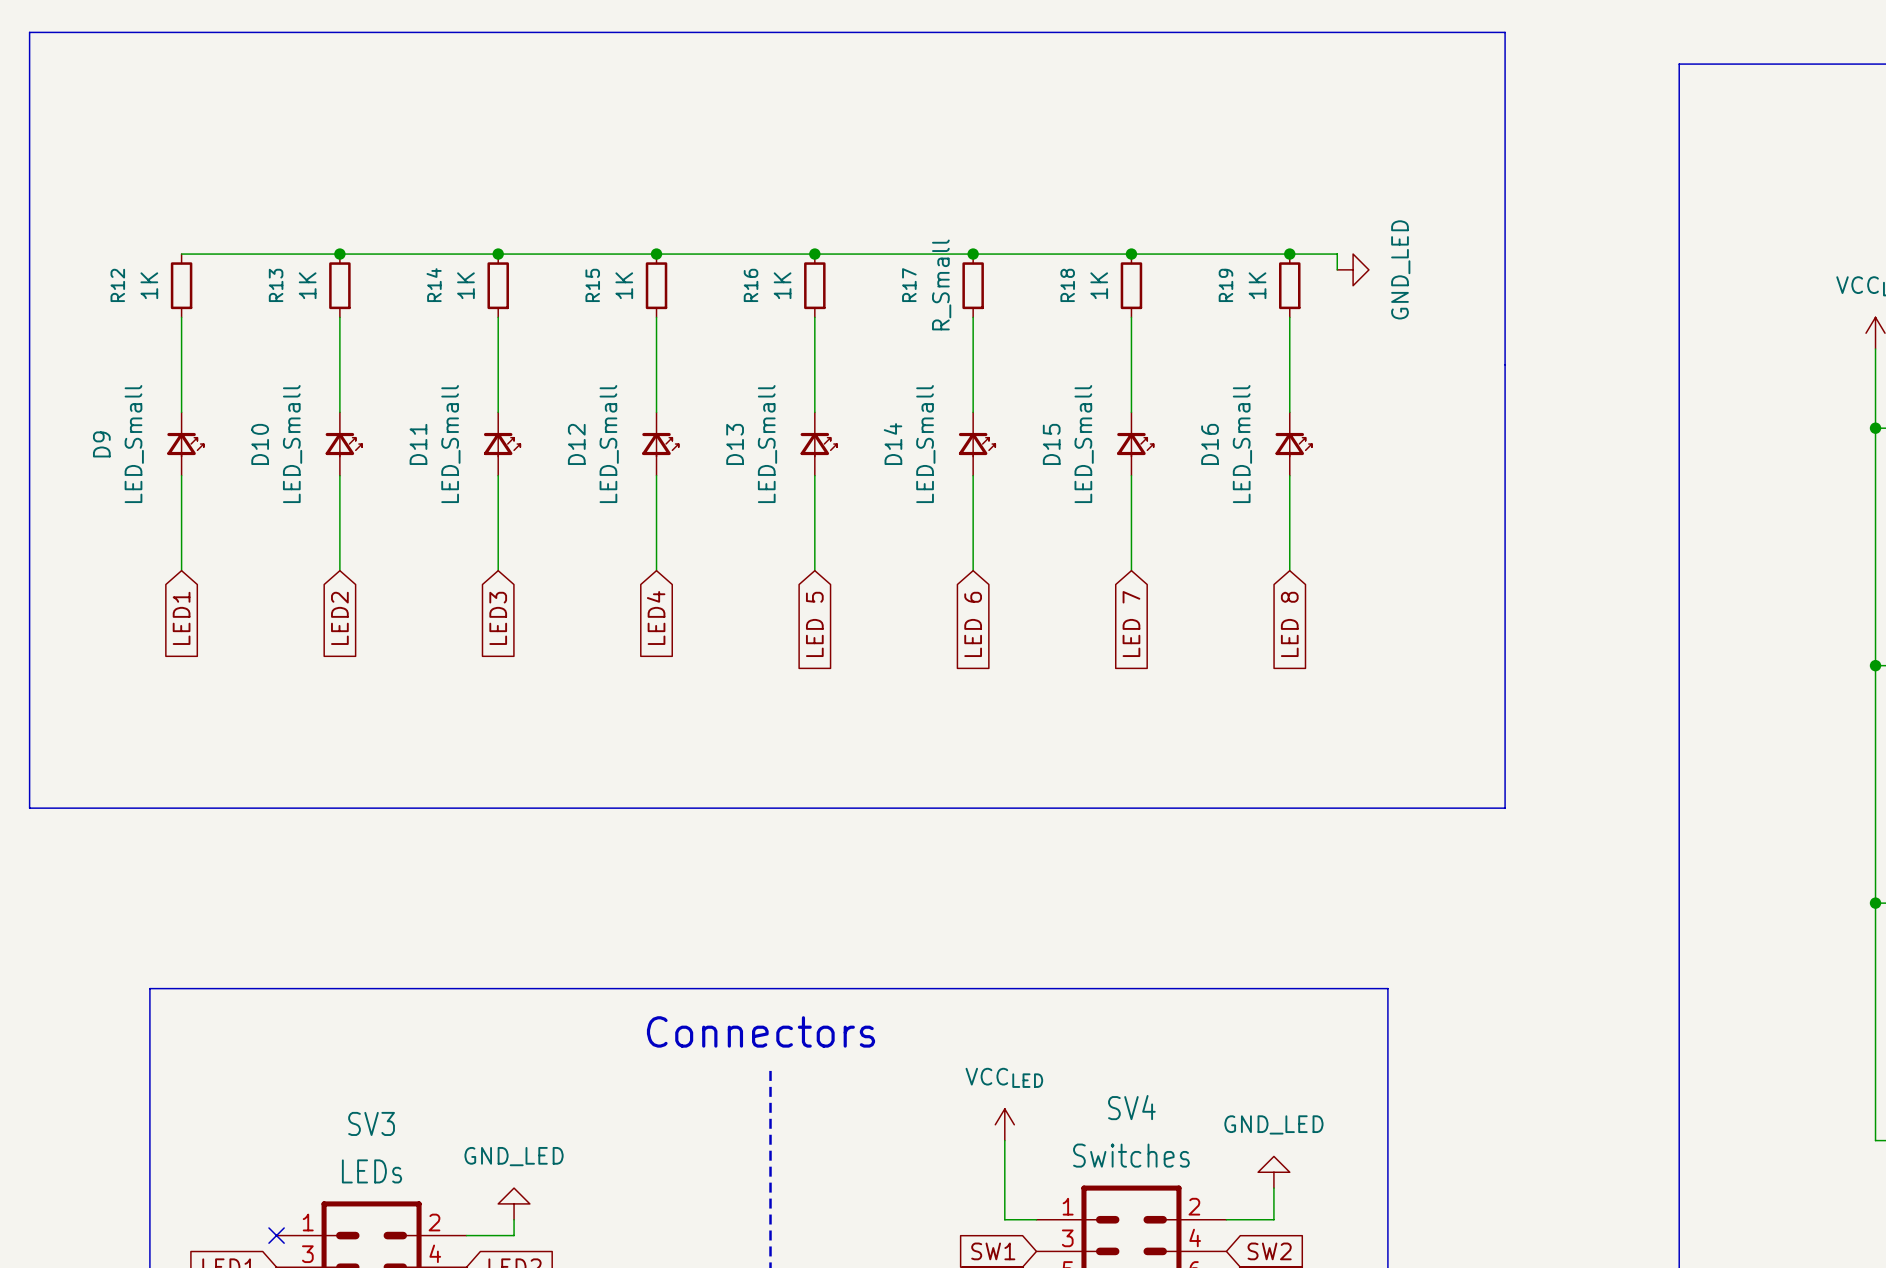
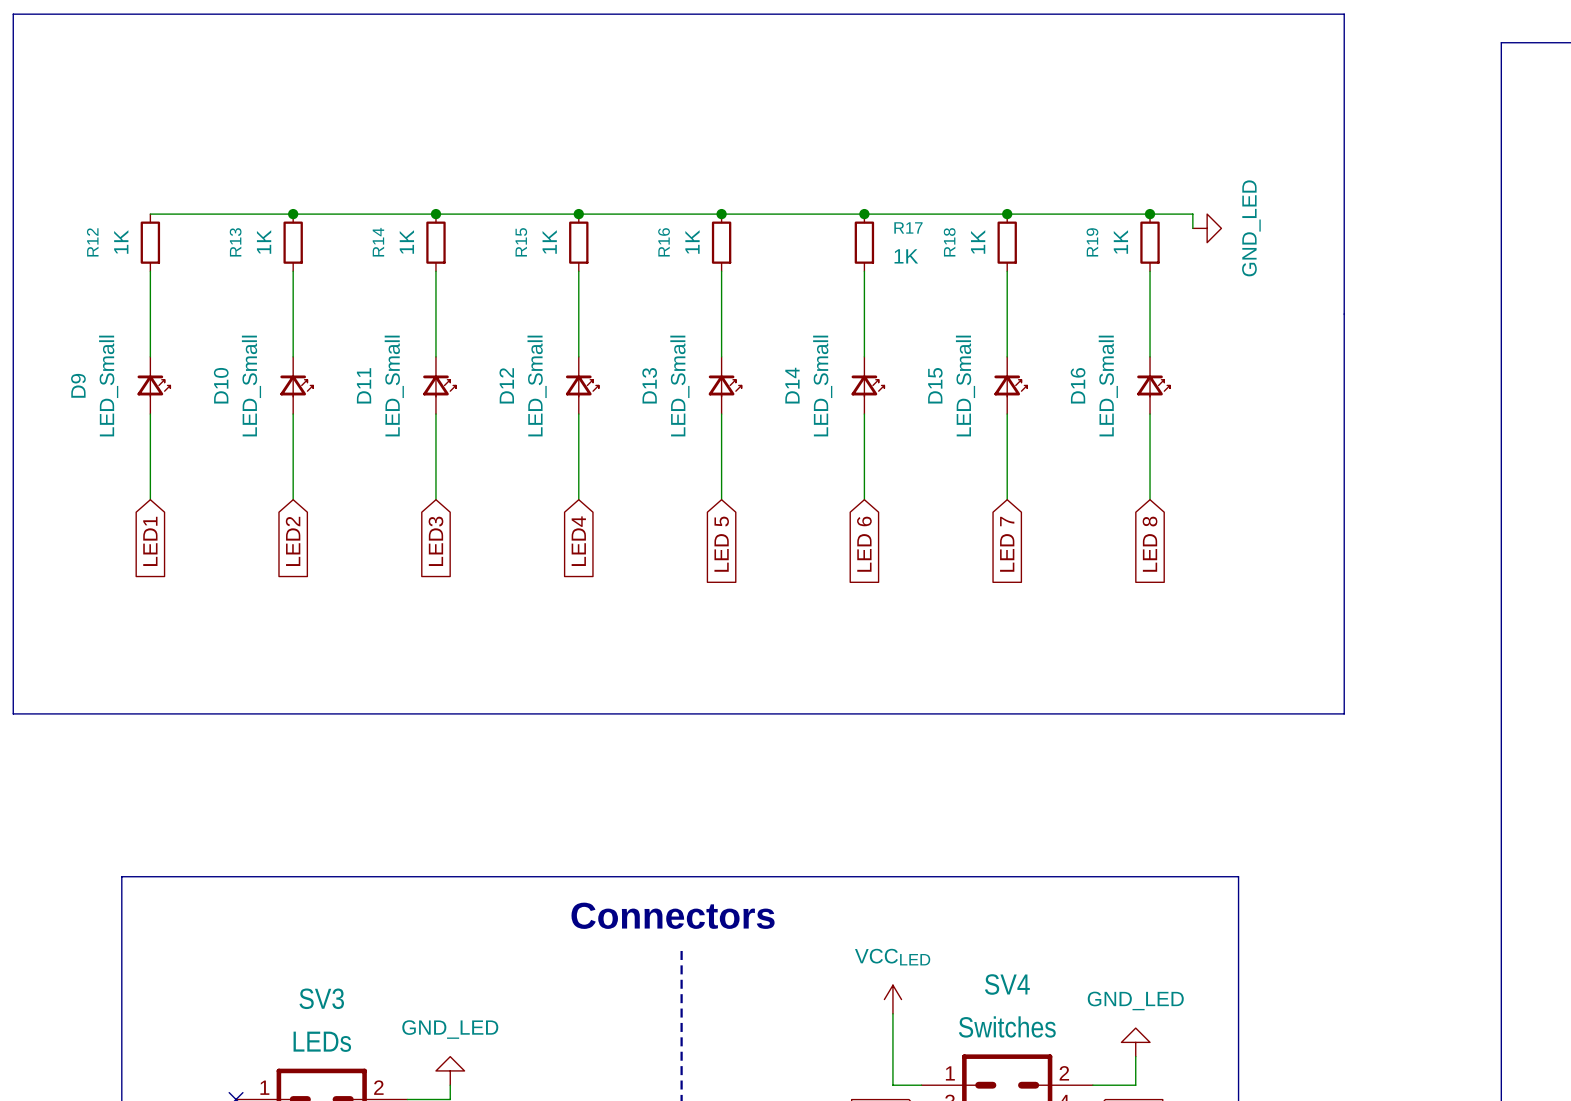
R17 value: R_Small (941, 284) -> 1K (906, 256)
R17 name rotation: 0° (909, 285) -> 90° clockwise (908, 227)
R17 name position: R17 (909, 285) -> R17 (908, 227)

